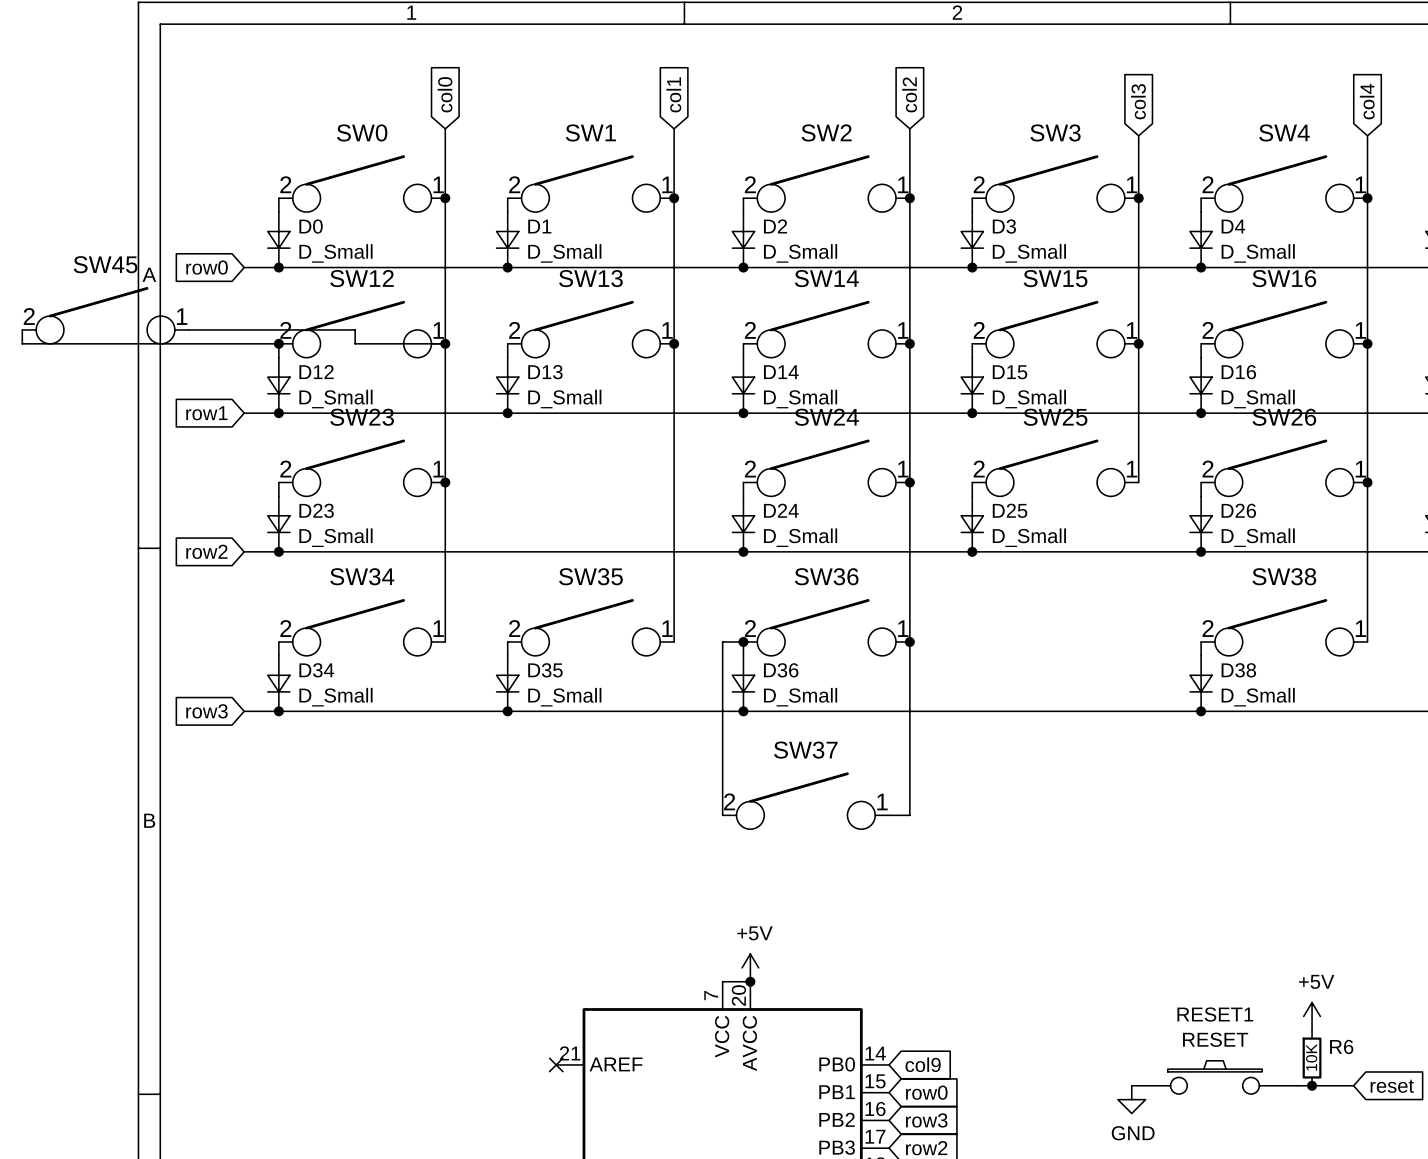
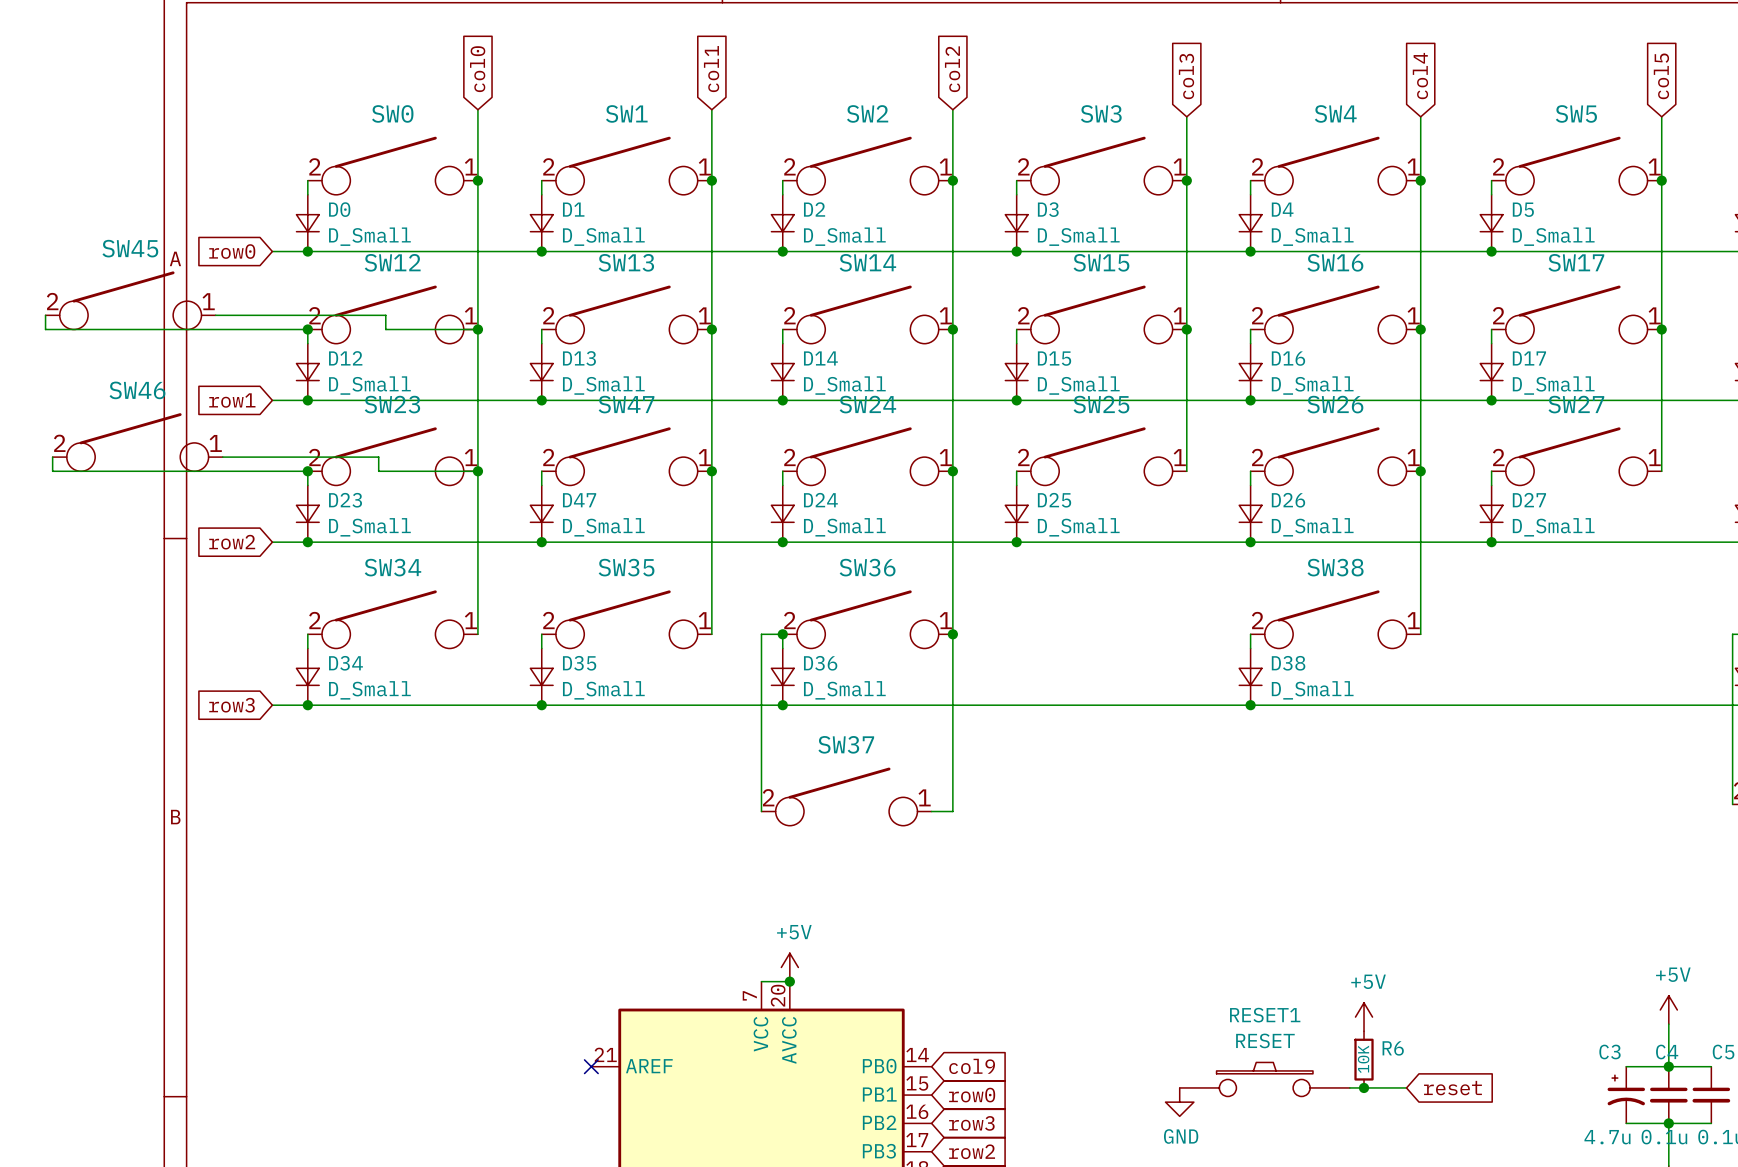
SW46: none -> (137, 442)
SW47: none -> (626, 456)
wire: none -> (52, 457) (52, 471) (307, 471)
wire: none -> (222, 457) (378, 457) (378, 471) (477, 471)
junction: none -> (307, 471)
wire: none -> (541, 471) (541, 485)
junction: none -> (711, 471)
D47: none -> D_Small (541, 513)
junction: none -> (541, 542)

